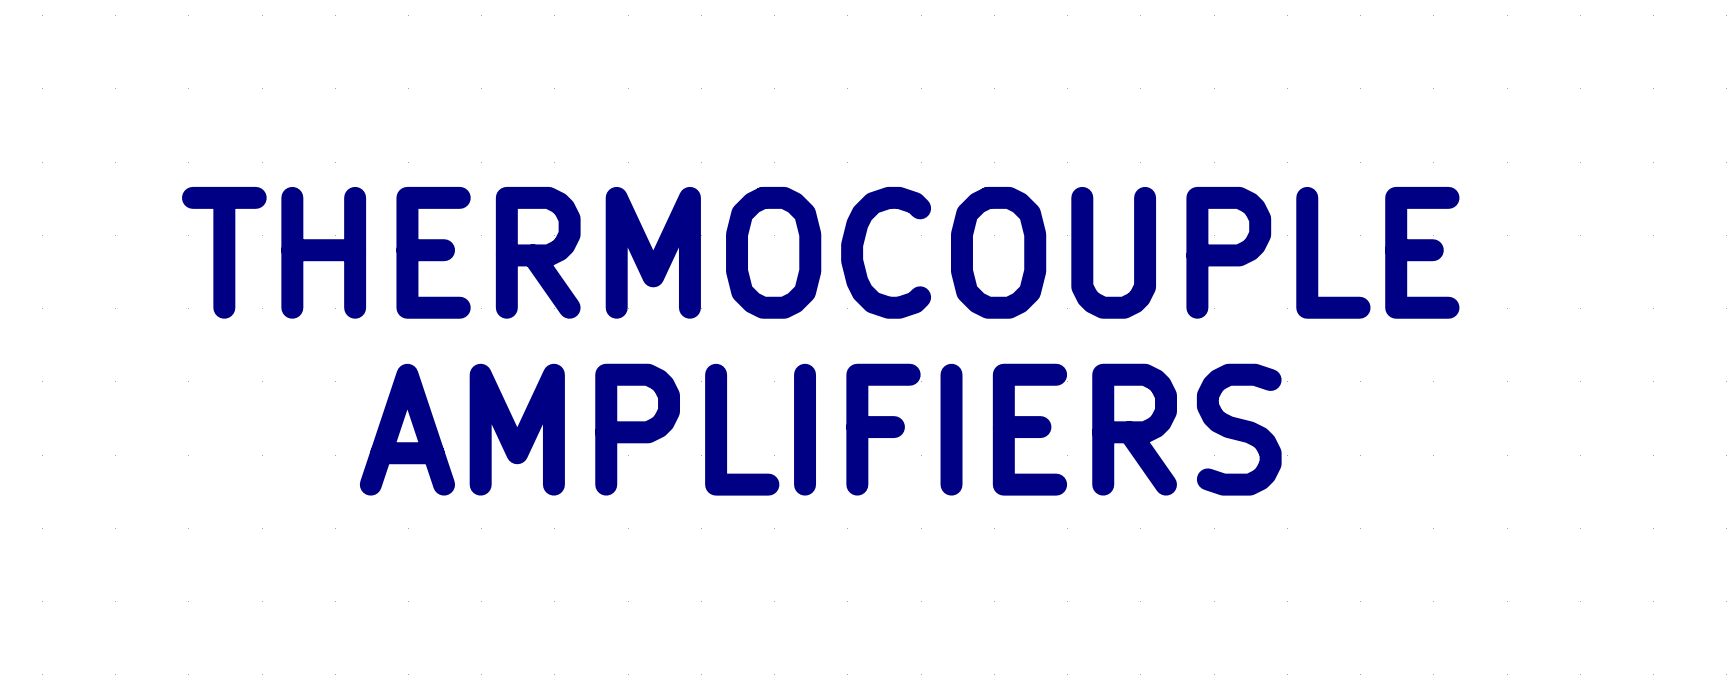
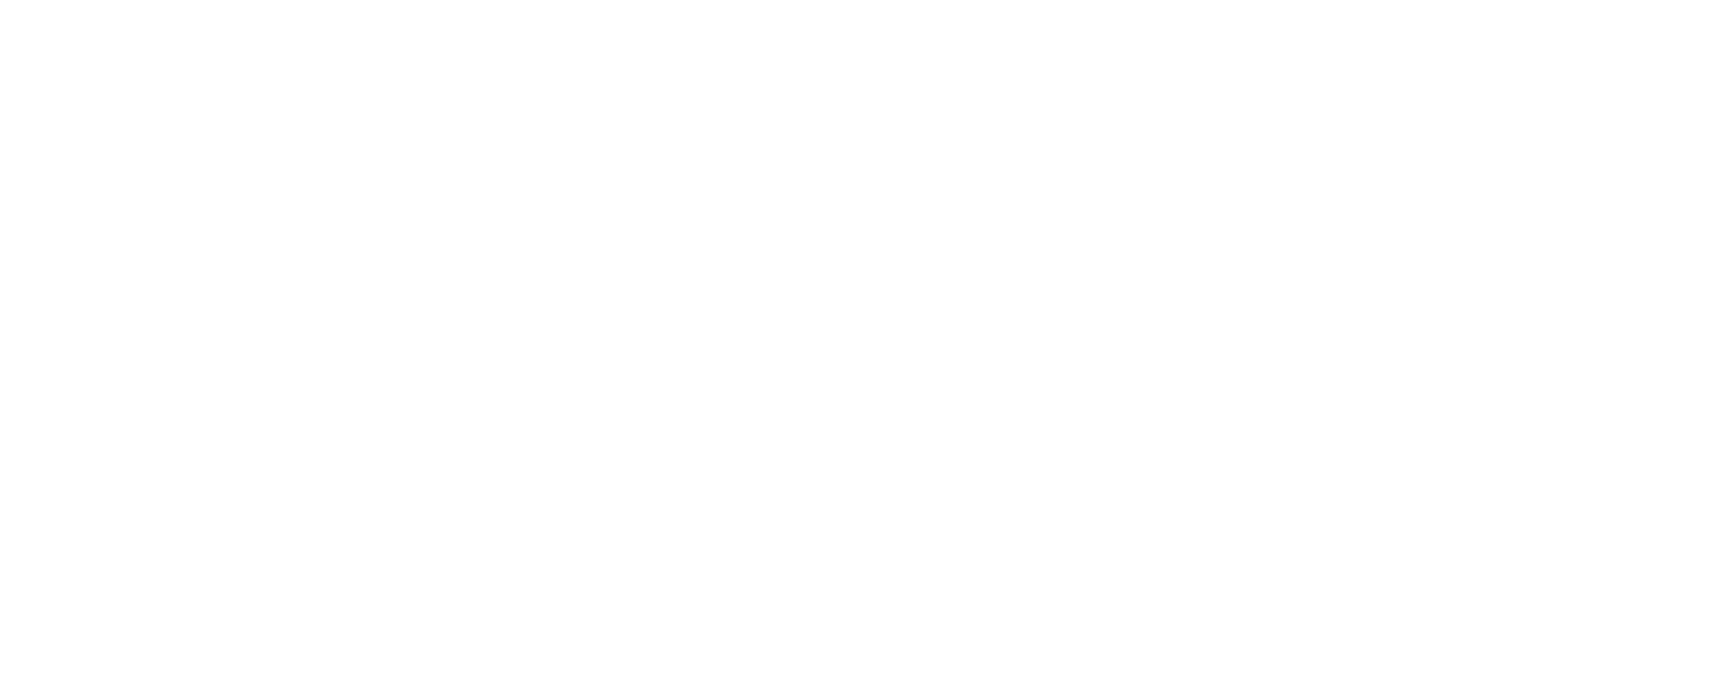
text: THERMOCOUPLE (820, 252) -> none
text: AMPLIFIERS (820, 429) -> none

